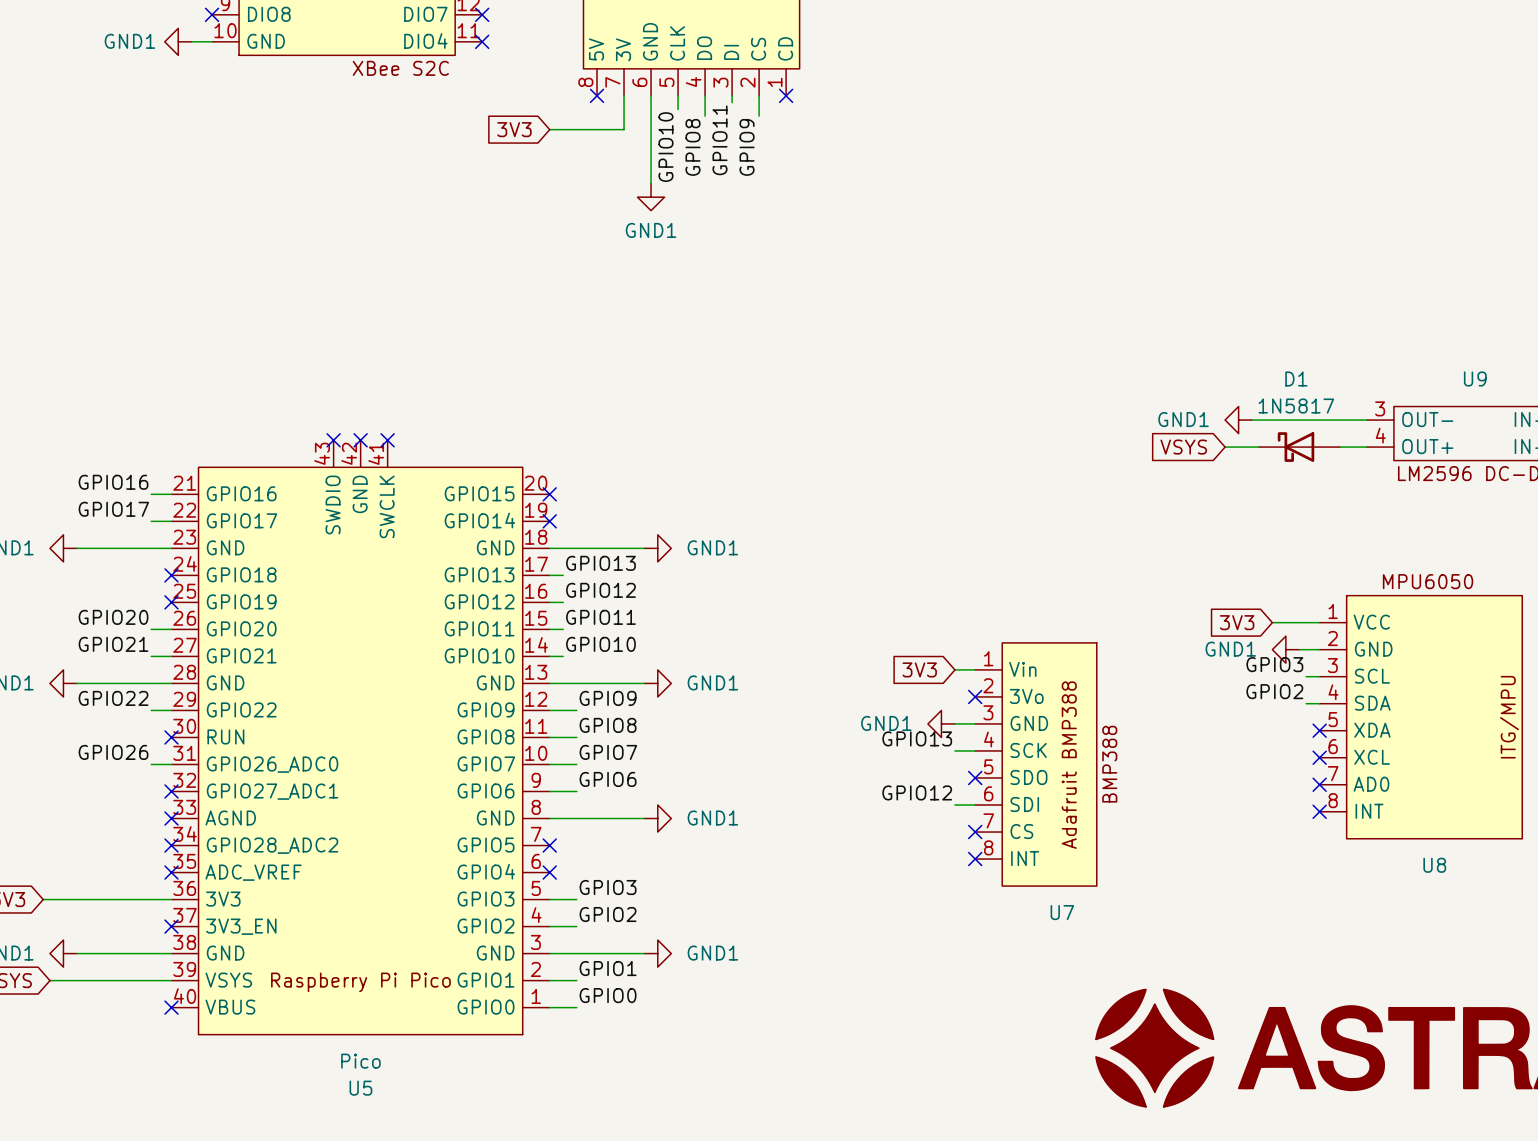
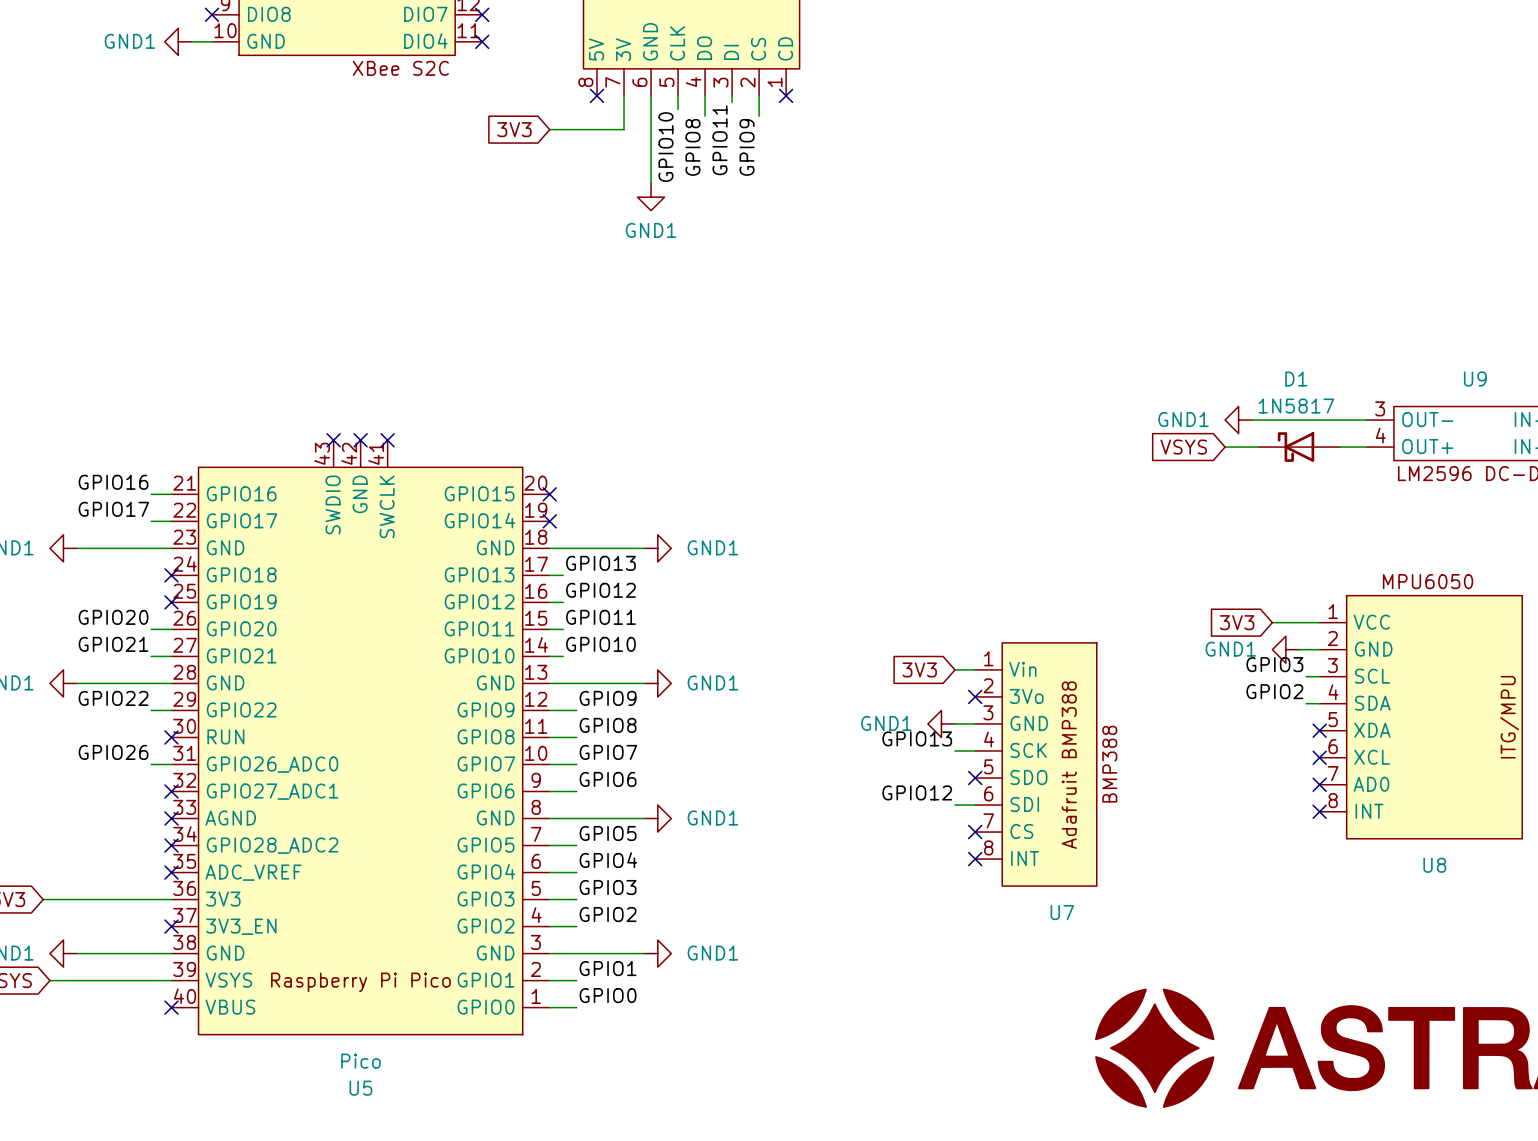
label: none -> GPIO5 (608, 833)
wire: none -> (549, 845) (576, 845)
no-connect mark: (549, 845) -> none
label: none -> GPIO4 (608, 860)
wire: none -> (549, 872) (576, 872)
no-connect mark: (549, 872) -> none

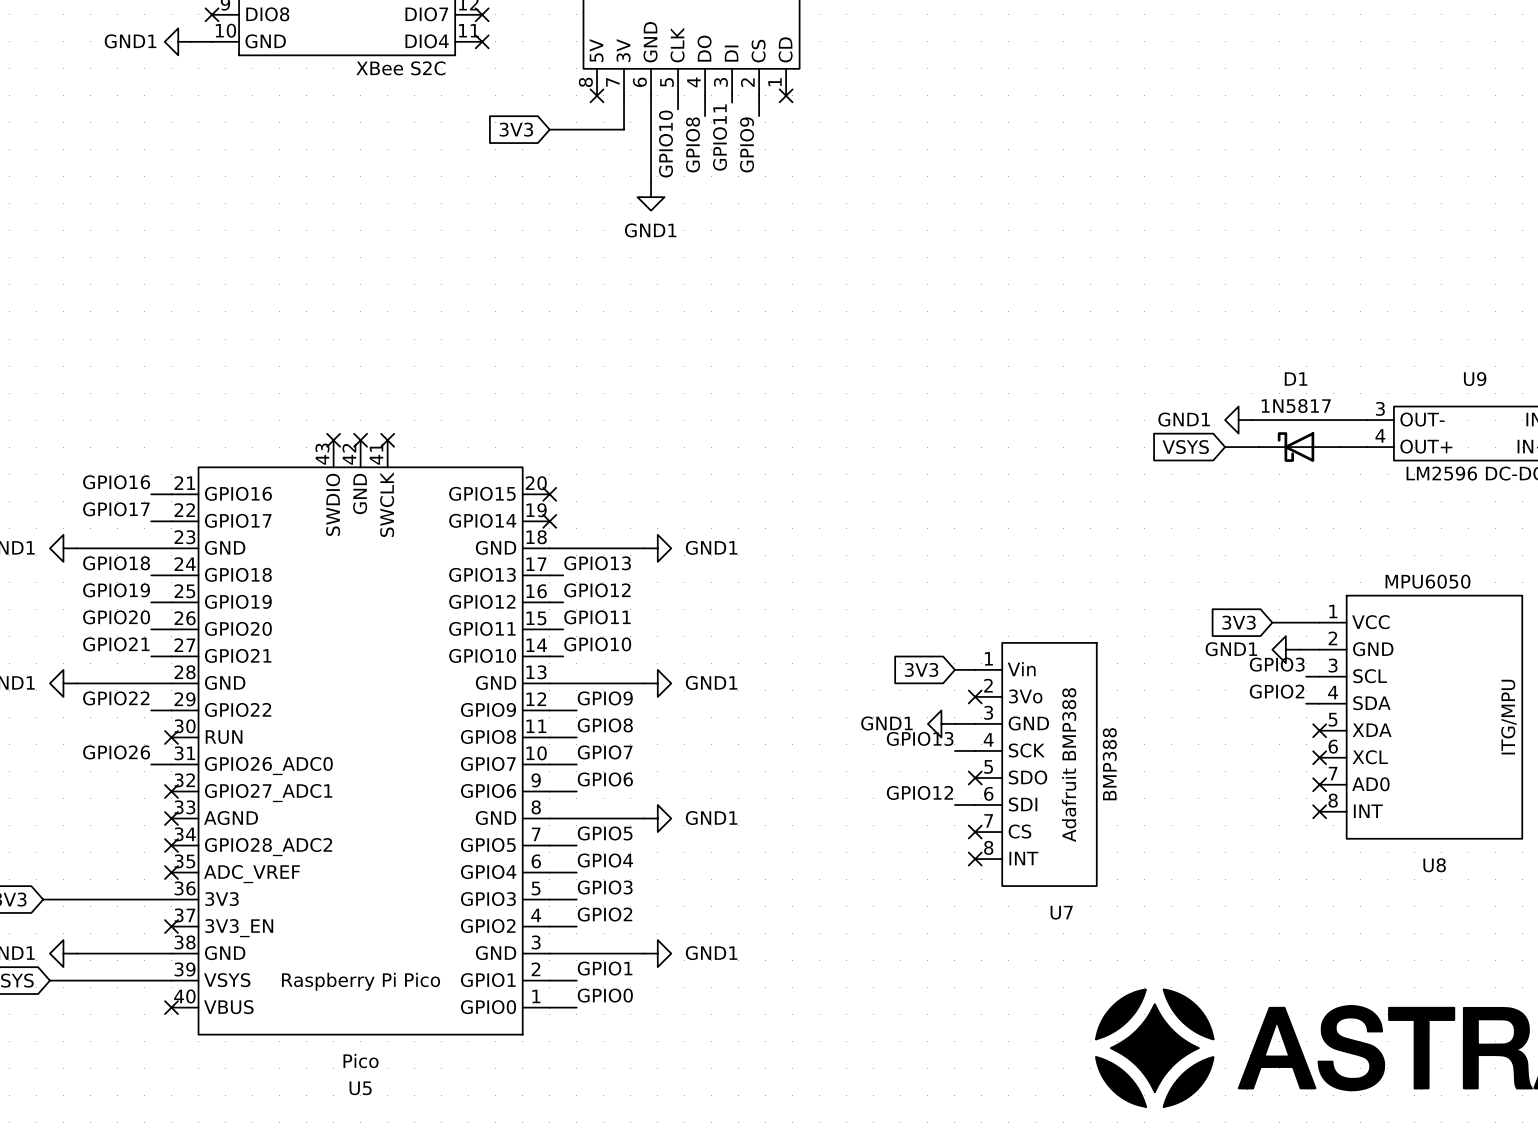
label: none -> GPIO18 (116, 563)
wire: none -> (151, 575) (171, 575)
no-connect mark: (171, 575) -> none
label: none -> GPIO19 (116, 590)
wire: none -> (151, 602) (171, 602)
no-connect mark: (171, 602) -> none

